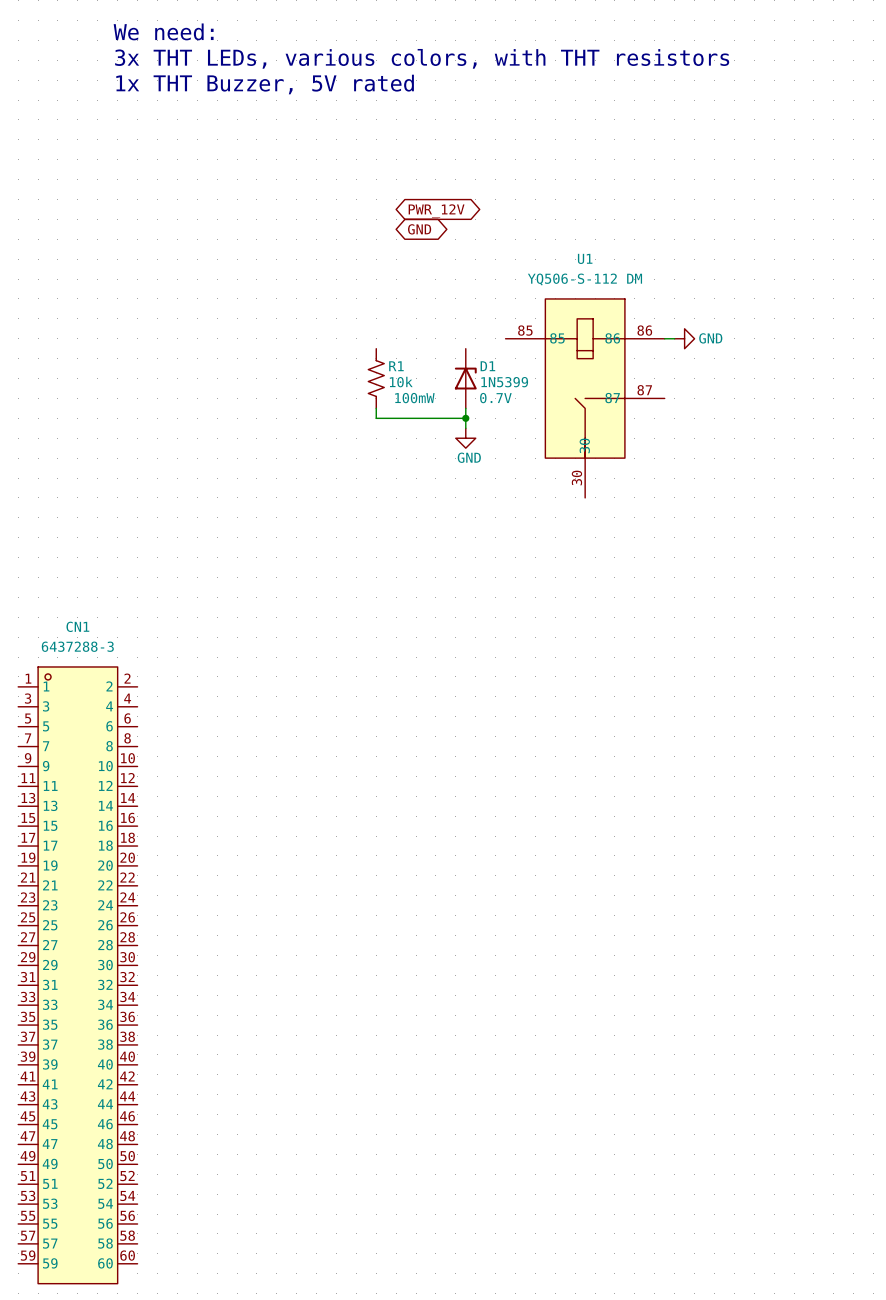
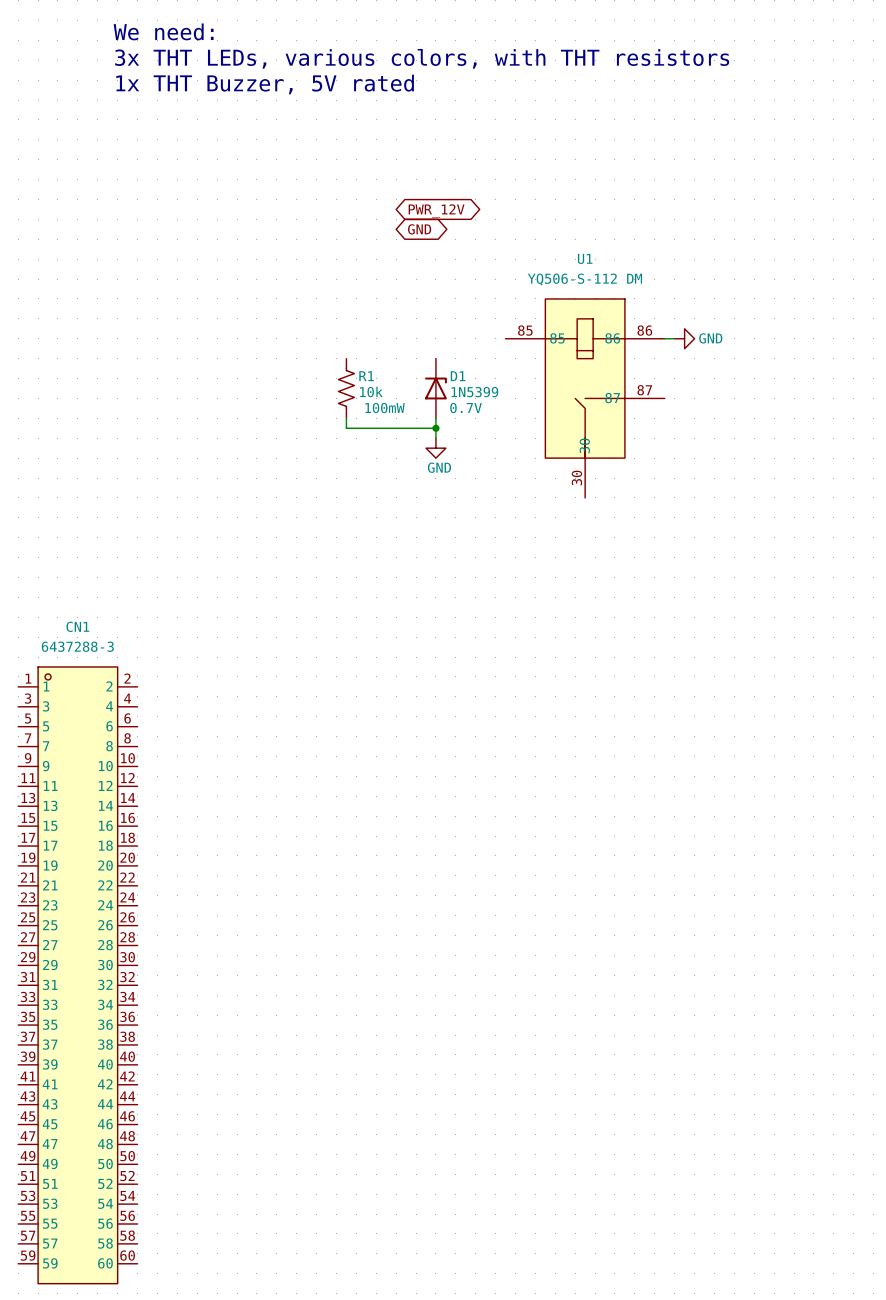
R1 position: (376, 378) -> (346, 388)
D1 position: (465, 378) -> (435, 388)
wire: (376, 408) (376, 418) (465, 418) -> (346, 418) (346, 428) (435, 428)
wire: (465, 408) (465, 428) -> (435, 418) (435, 438)
junction position: (465, 418) -> (435, 428)
power symbol position: GND (465, 438) -> GND (435, 448)

